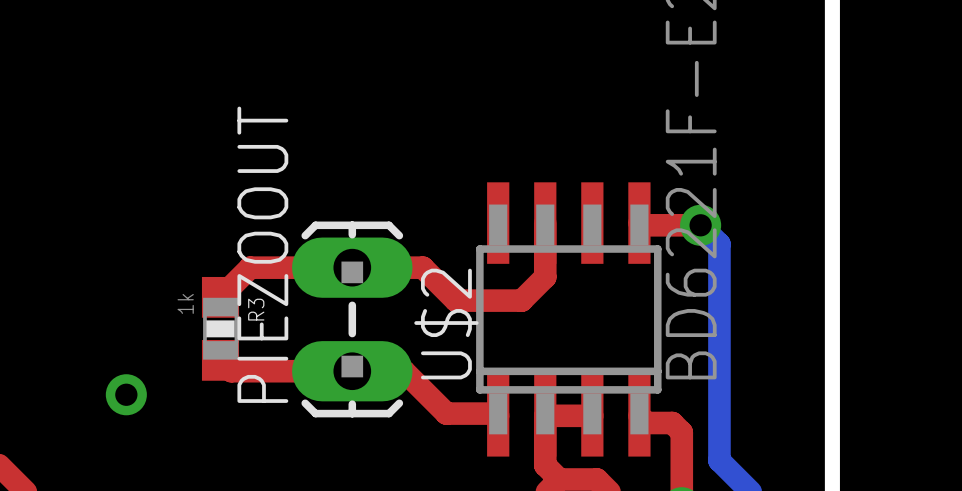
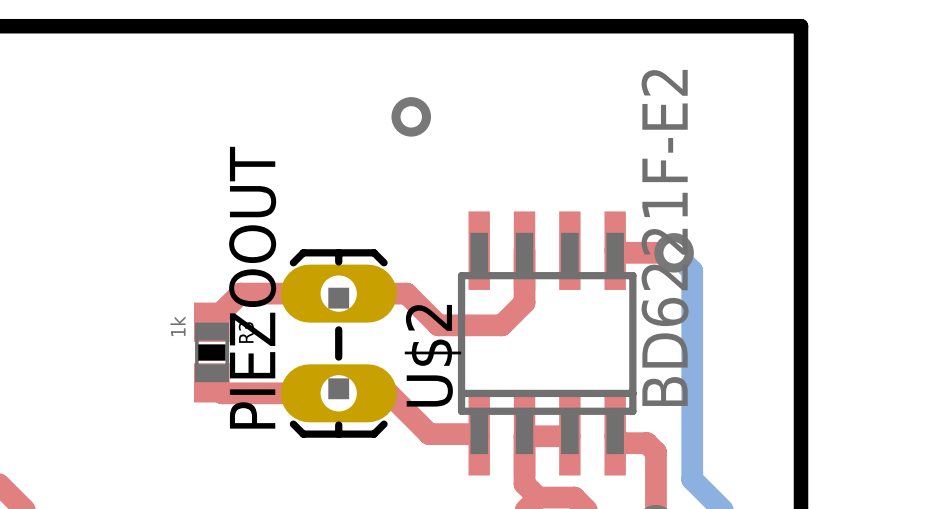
via: none -> (411, 116)
via: (126, 394) -> none

